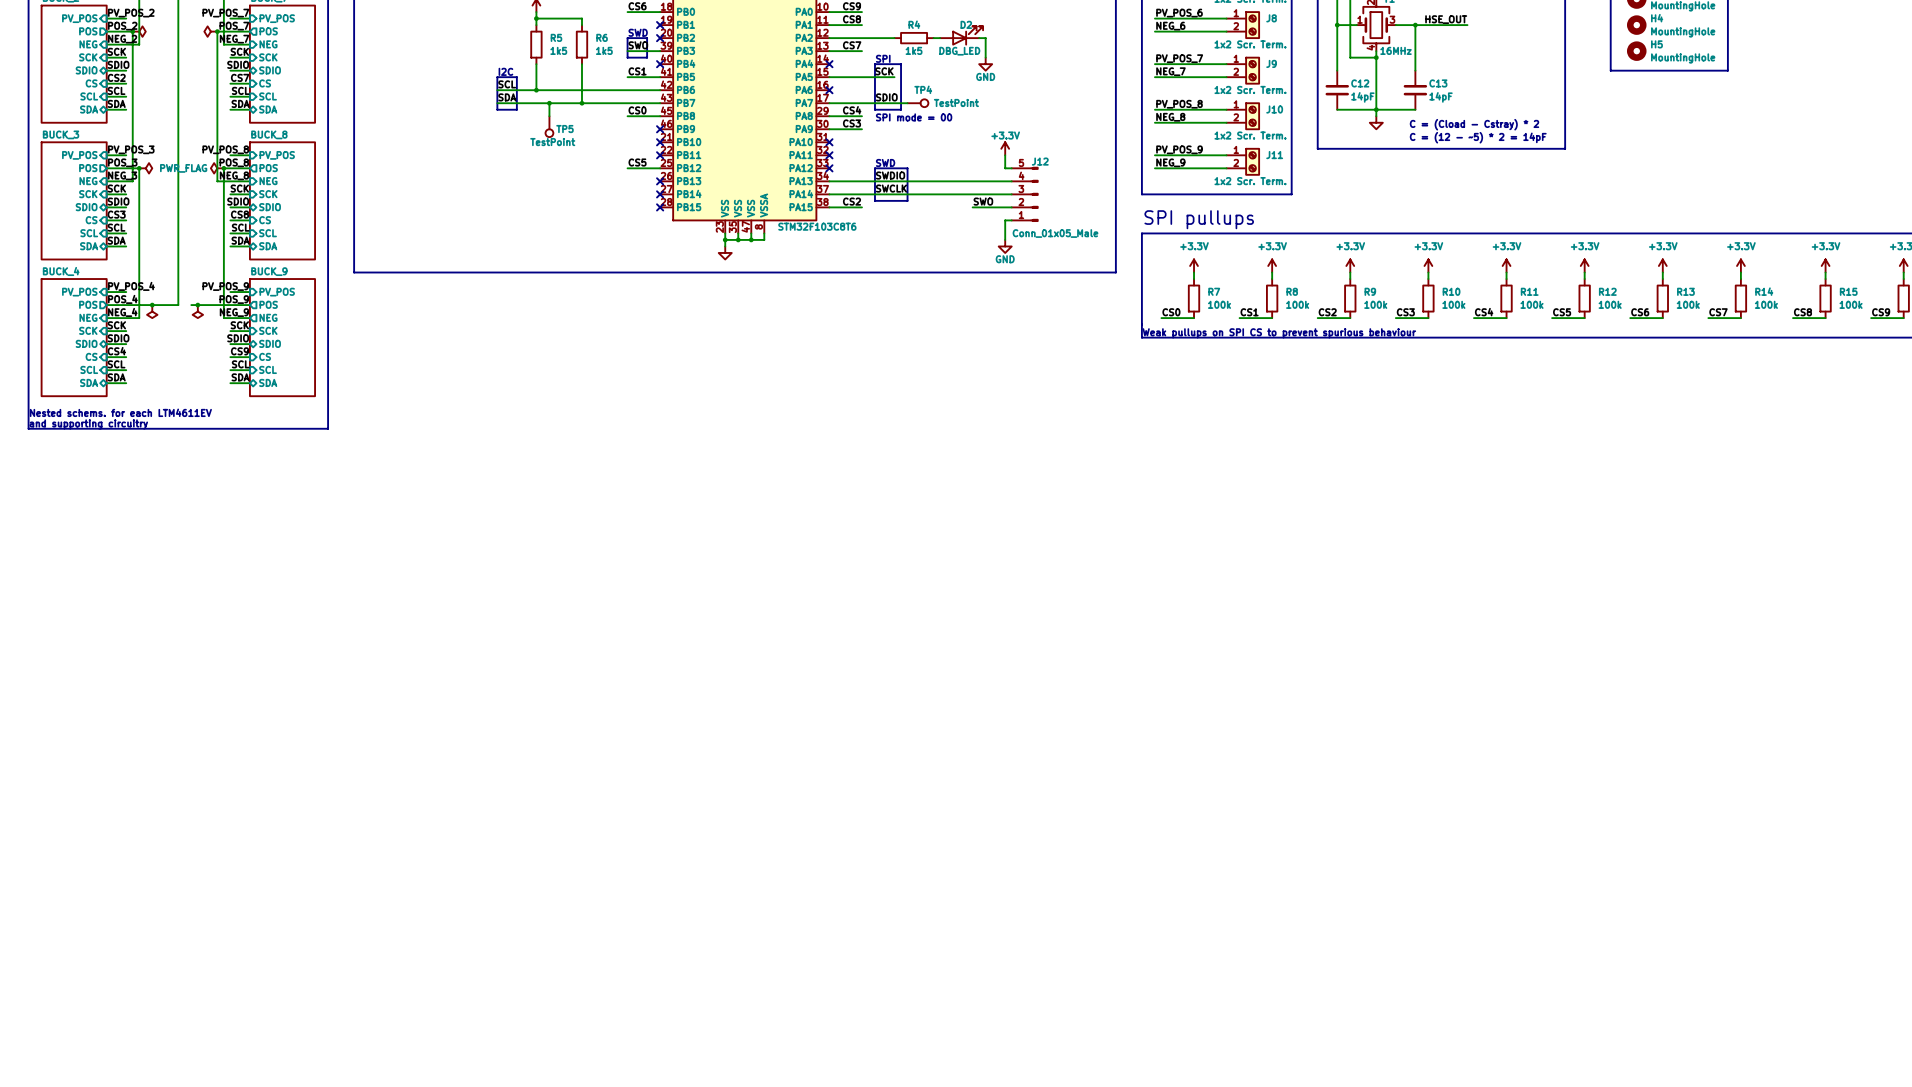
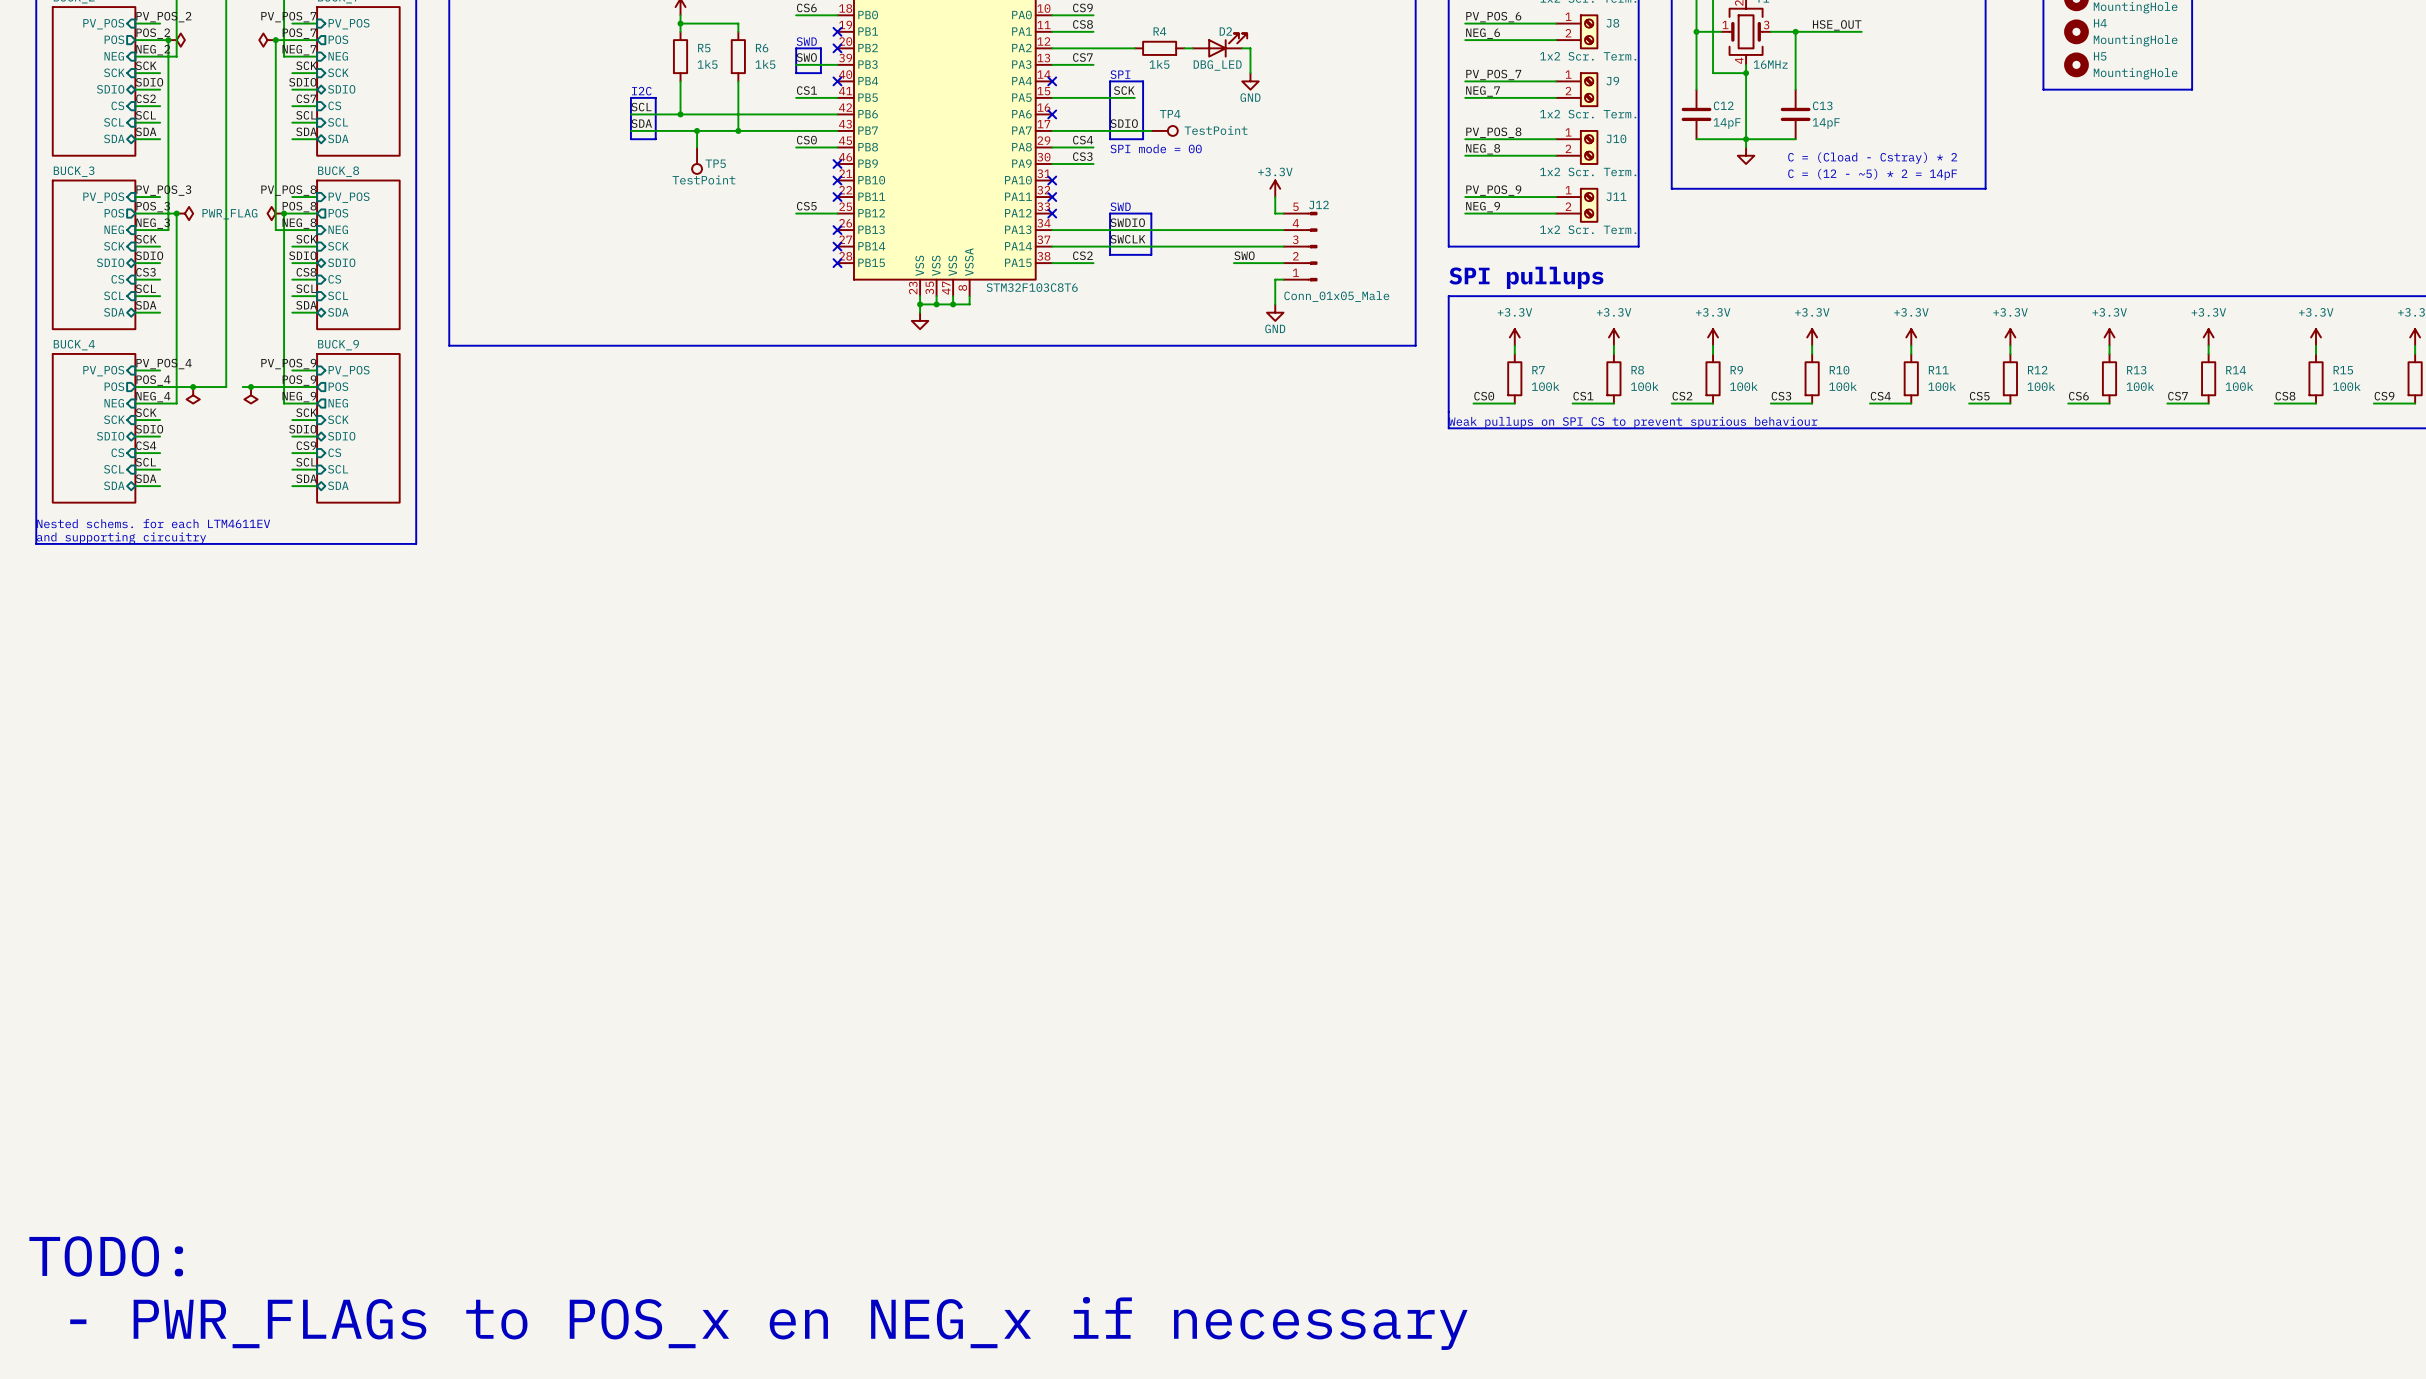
text: none -> TODO: (106, 1256)
text: none -> - PWR_FLAGs to POS_x en NEG_x if necessary (768, 1323)

